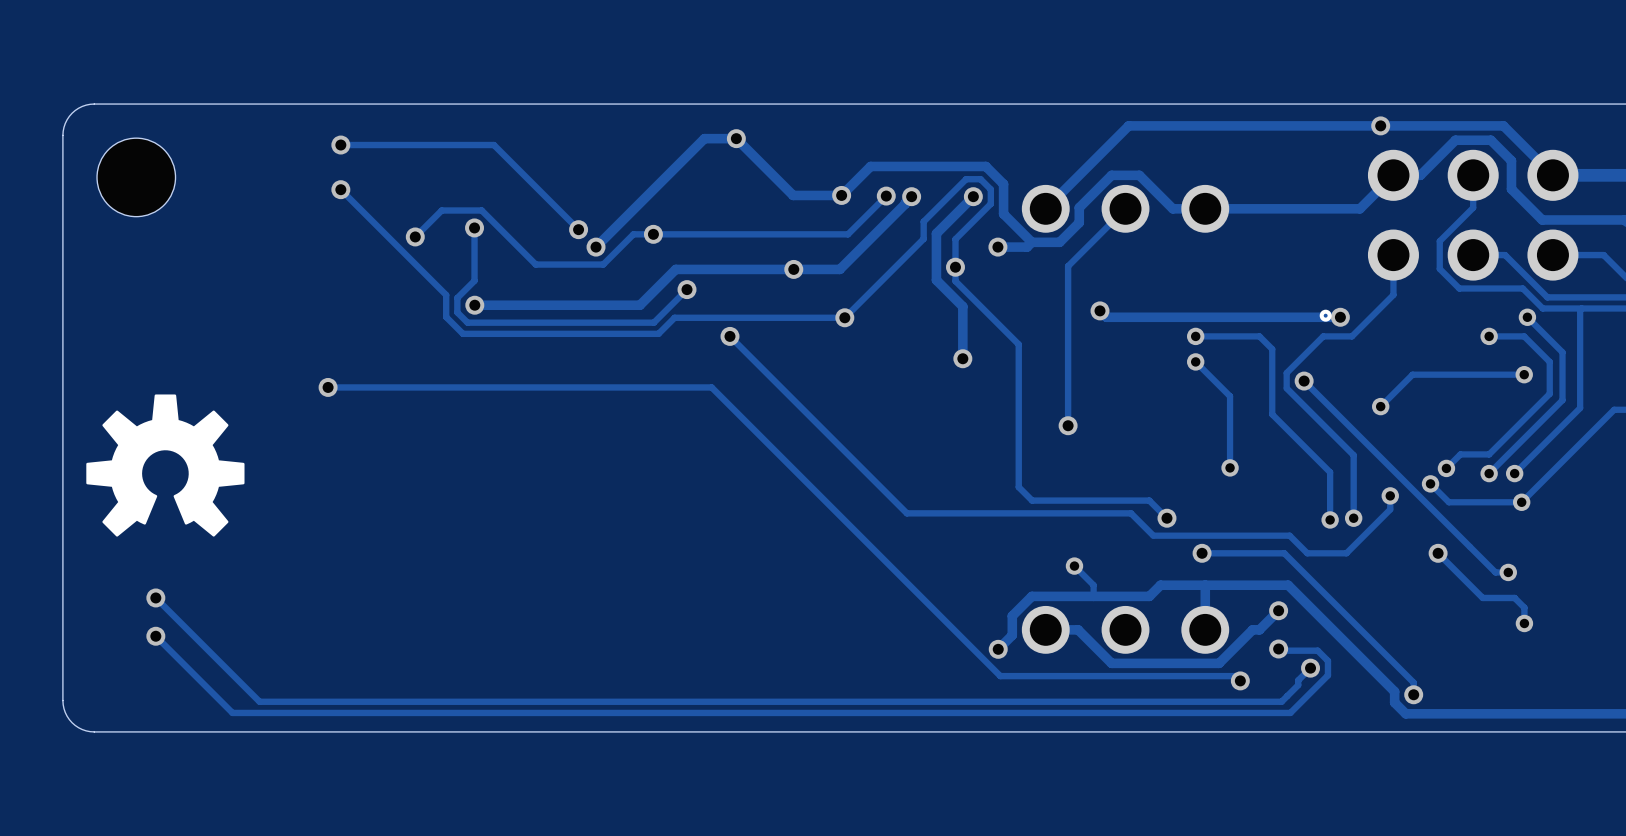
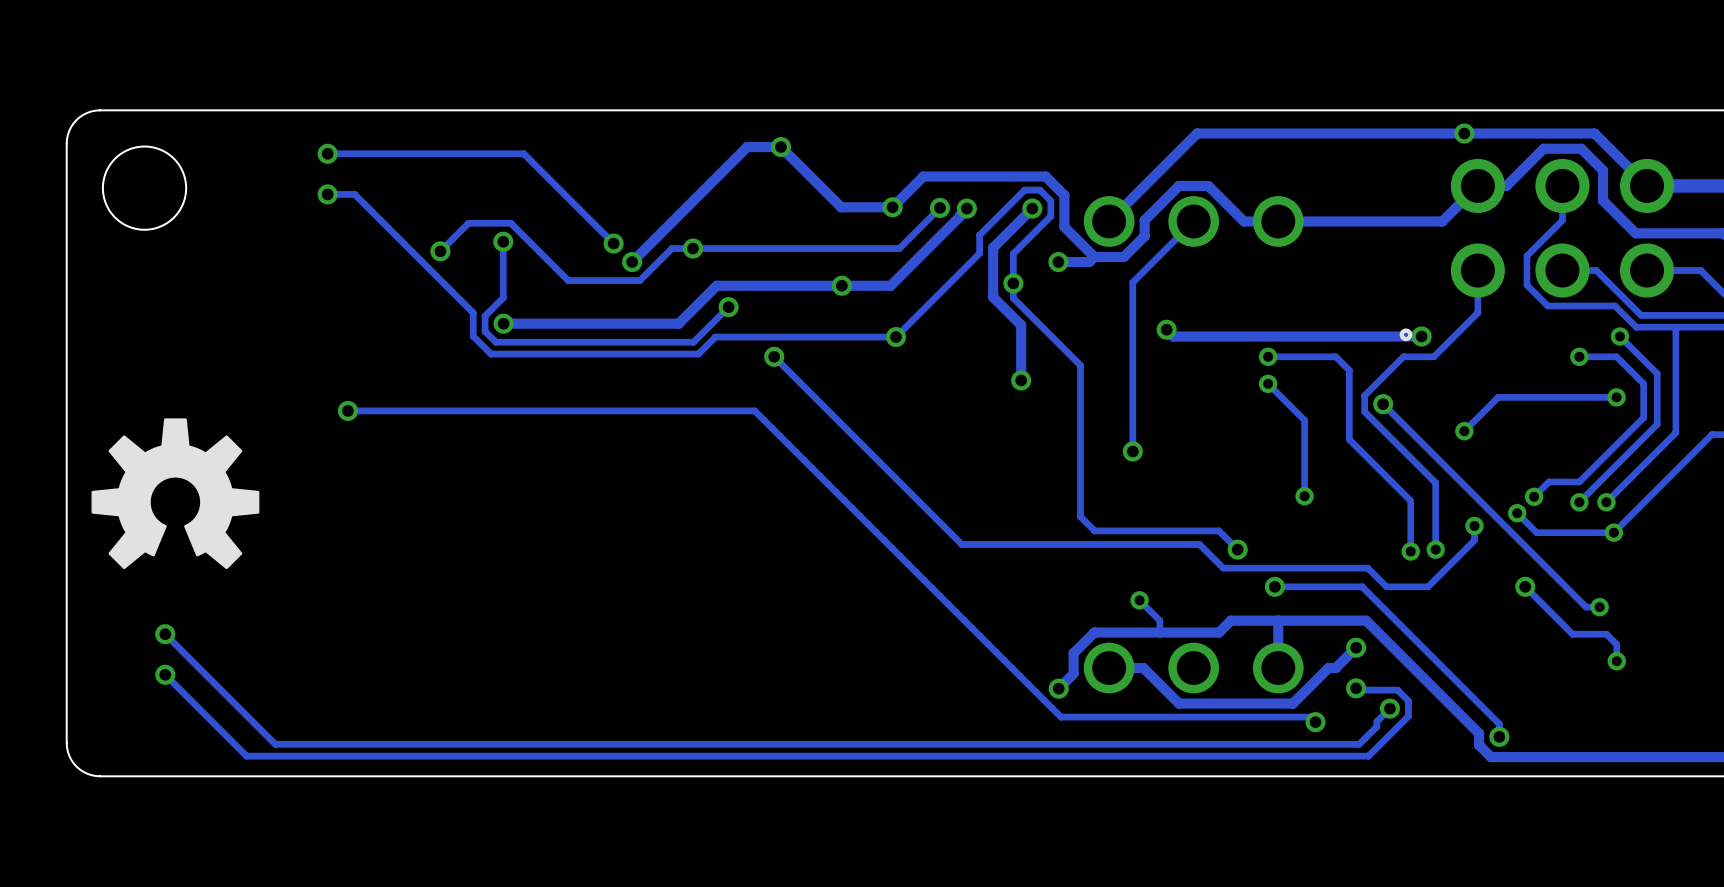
via: none -> (327, 153)
track: none -> (361, 153) (327, 153)
via: (340, 145) -> none
track: none -> (327, 194) (354, 194) (361, 201)
via: none -> (327, 194)
via: (340, 189) -> none

